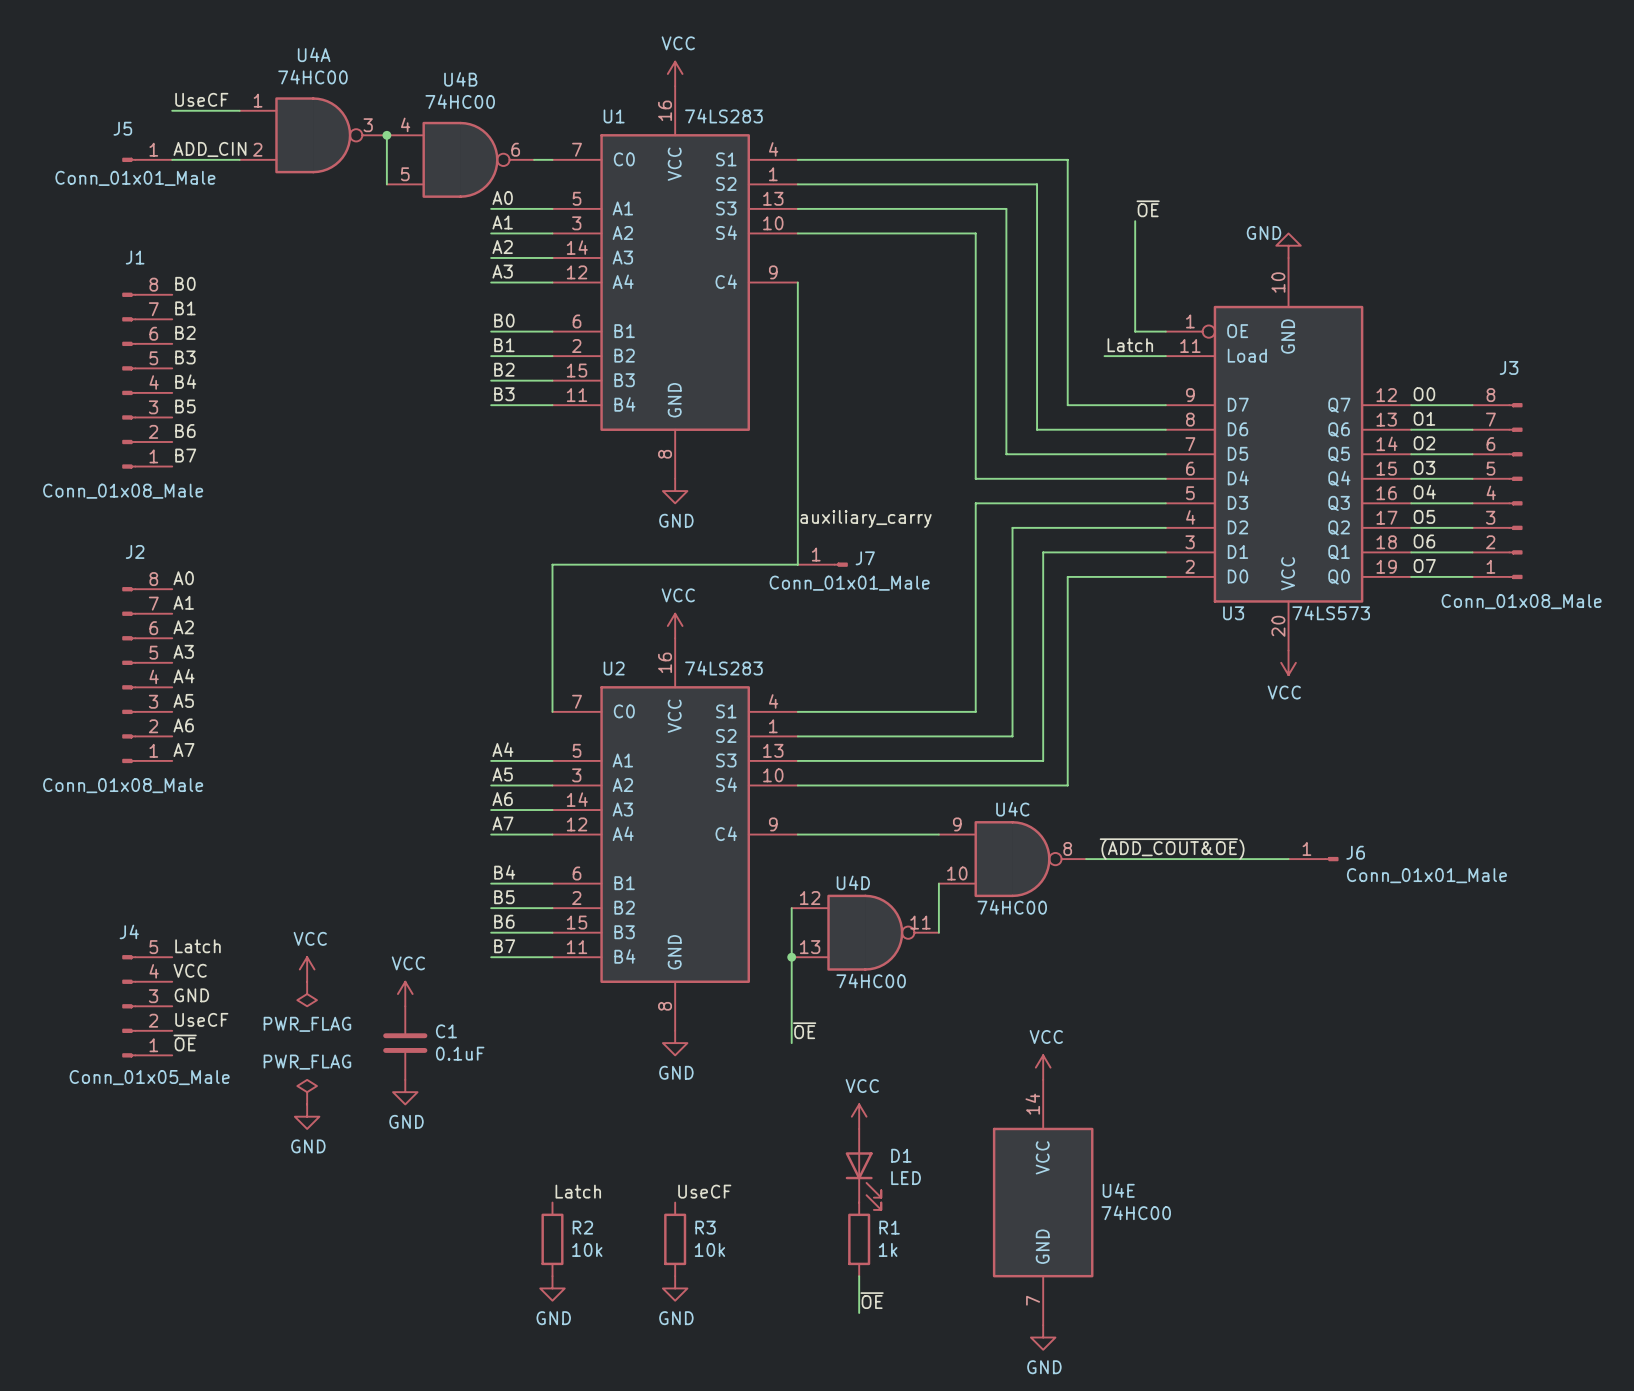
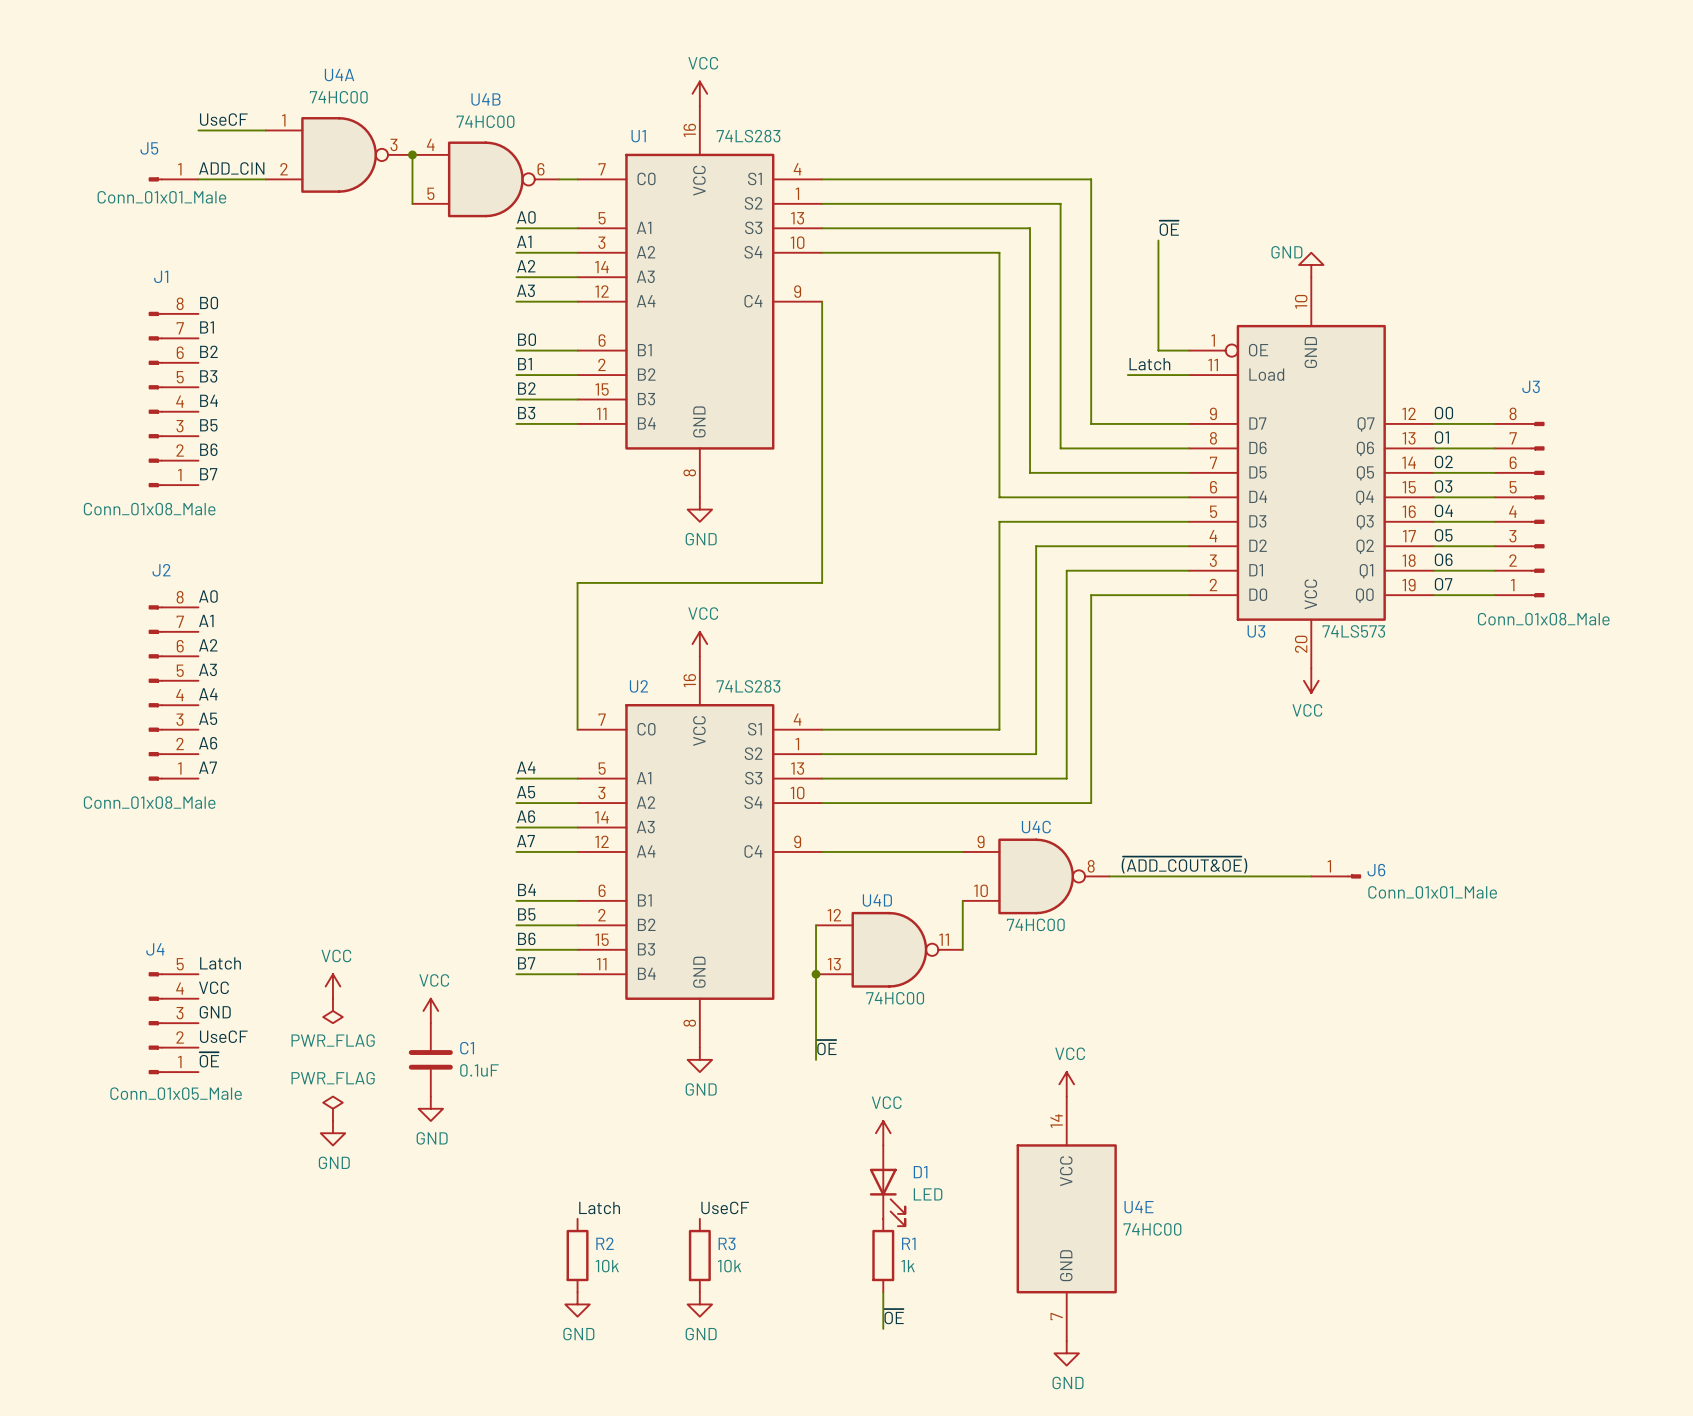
label: auxiliary_carry (865, 518) -> none
J7: Conn_01x01_Male (822, 564) -> none

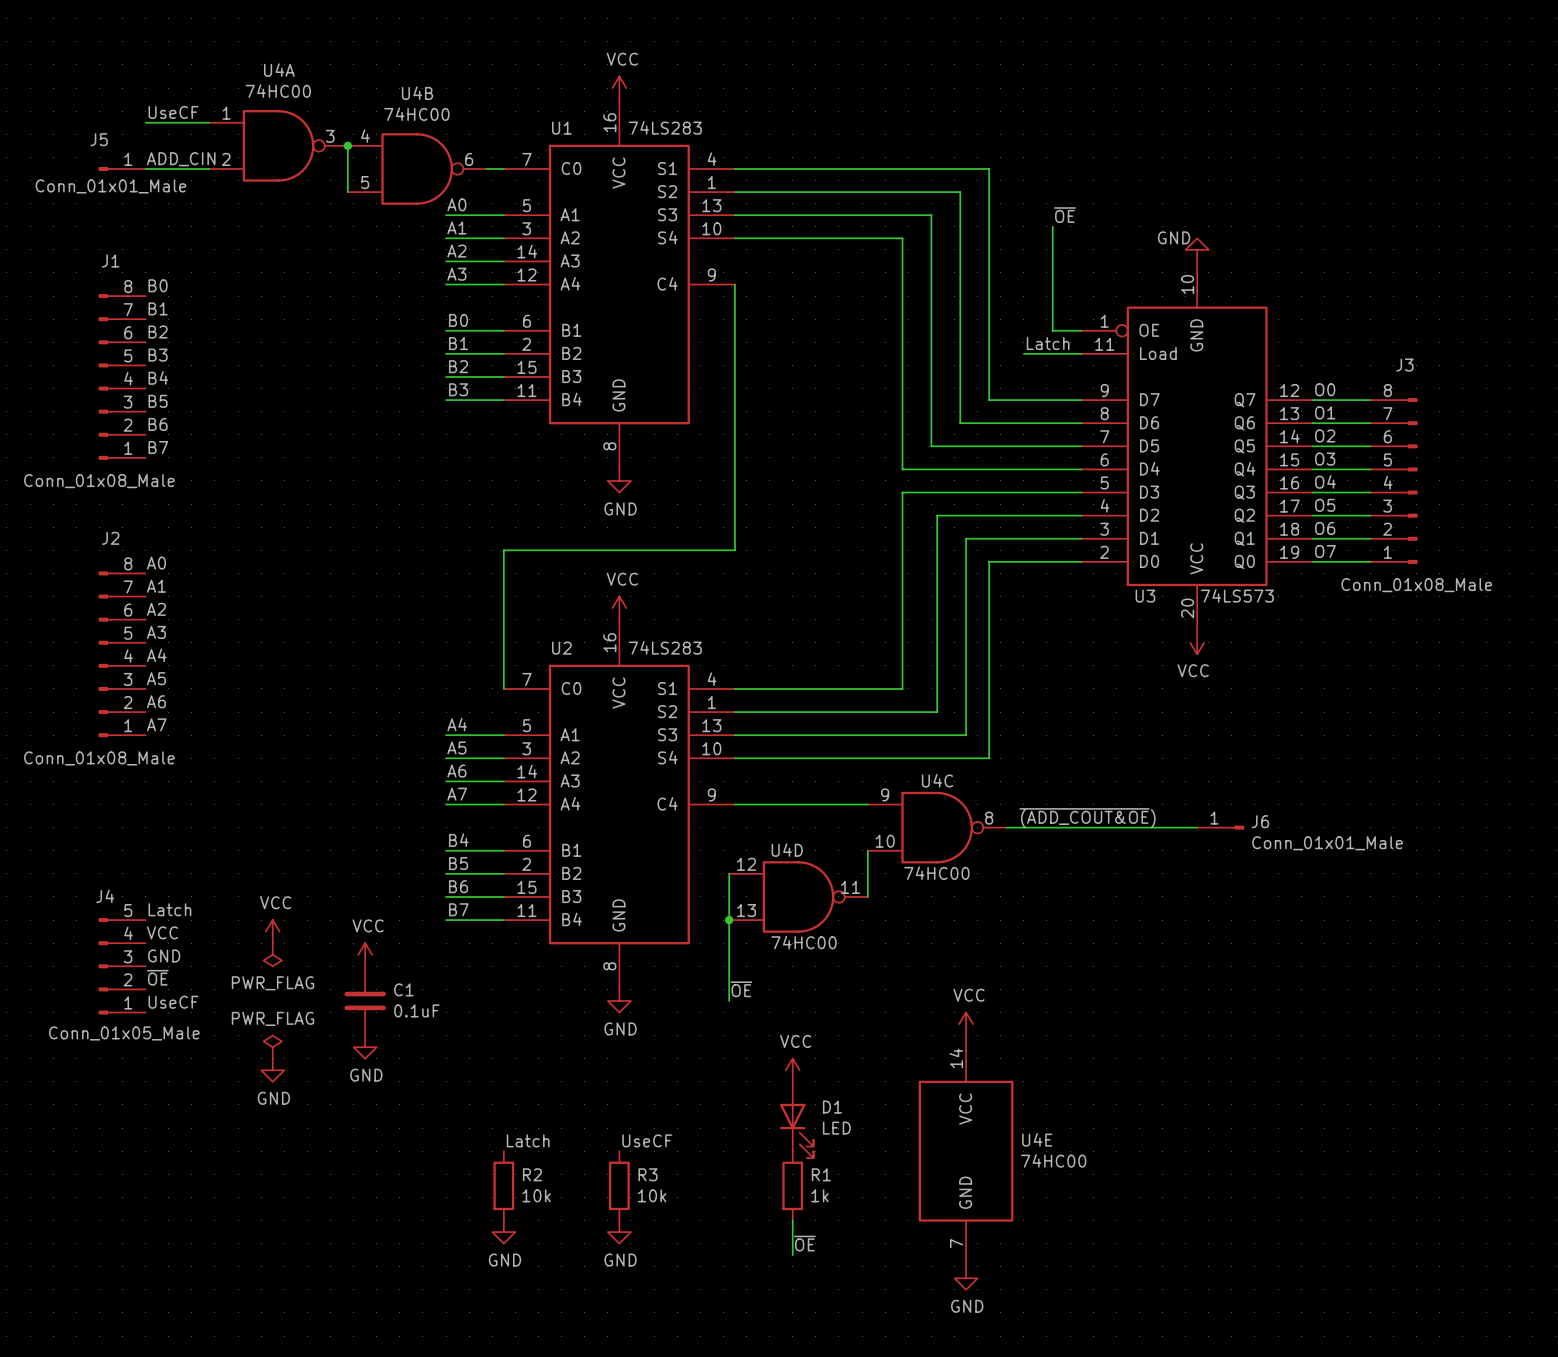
label: UseCF (223, 1036) -> ~{OE} (157, 977)
label: ~{OE} (209, 1059) -> UseCF (173, 1002)

